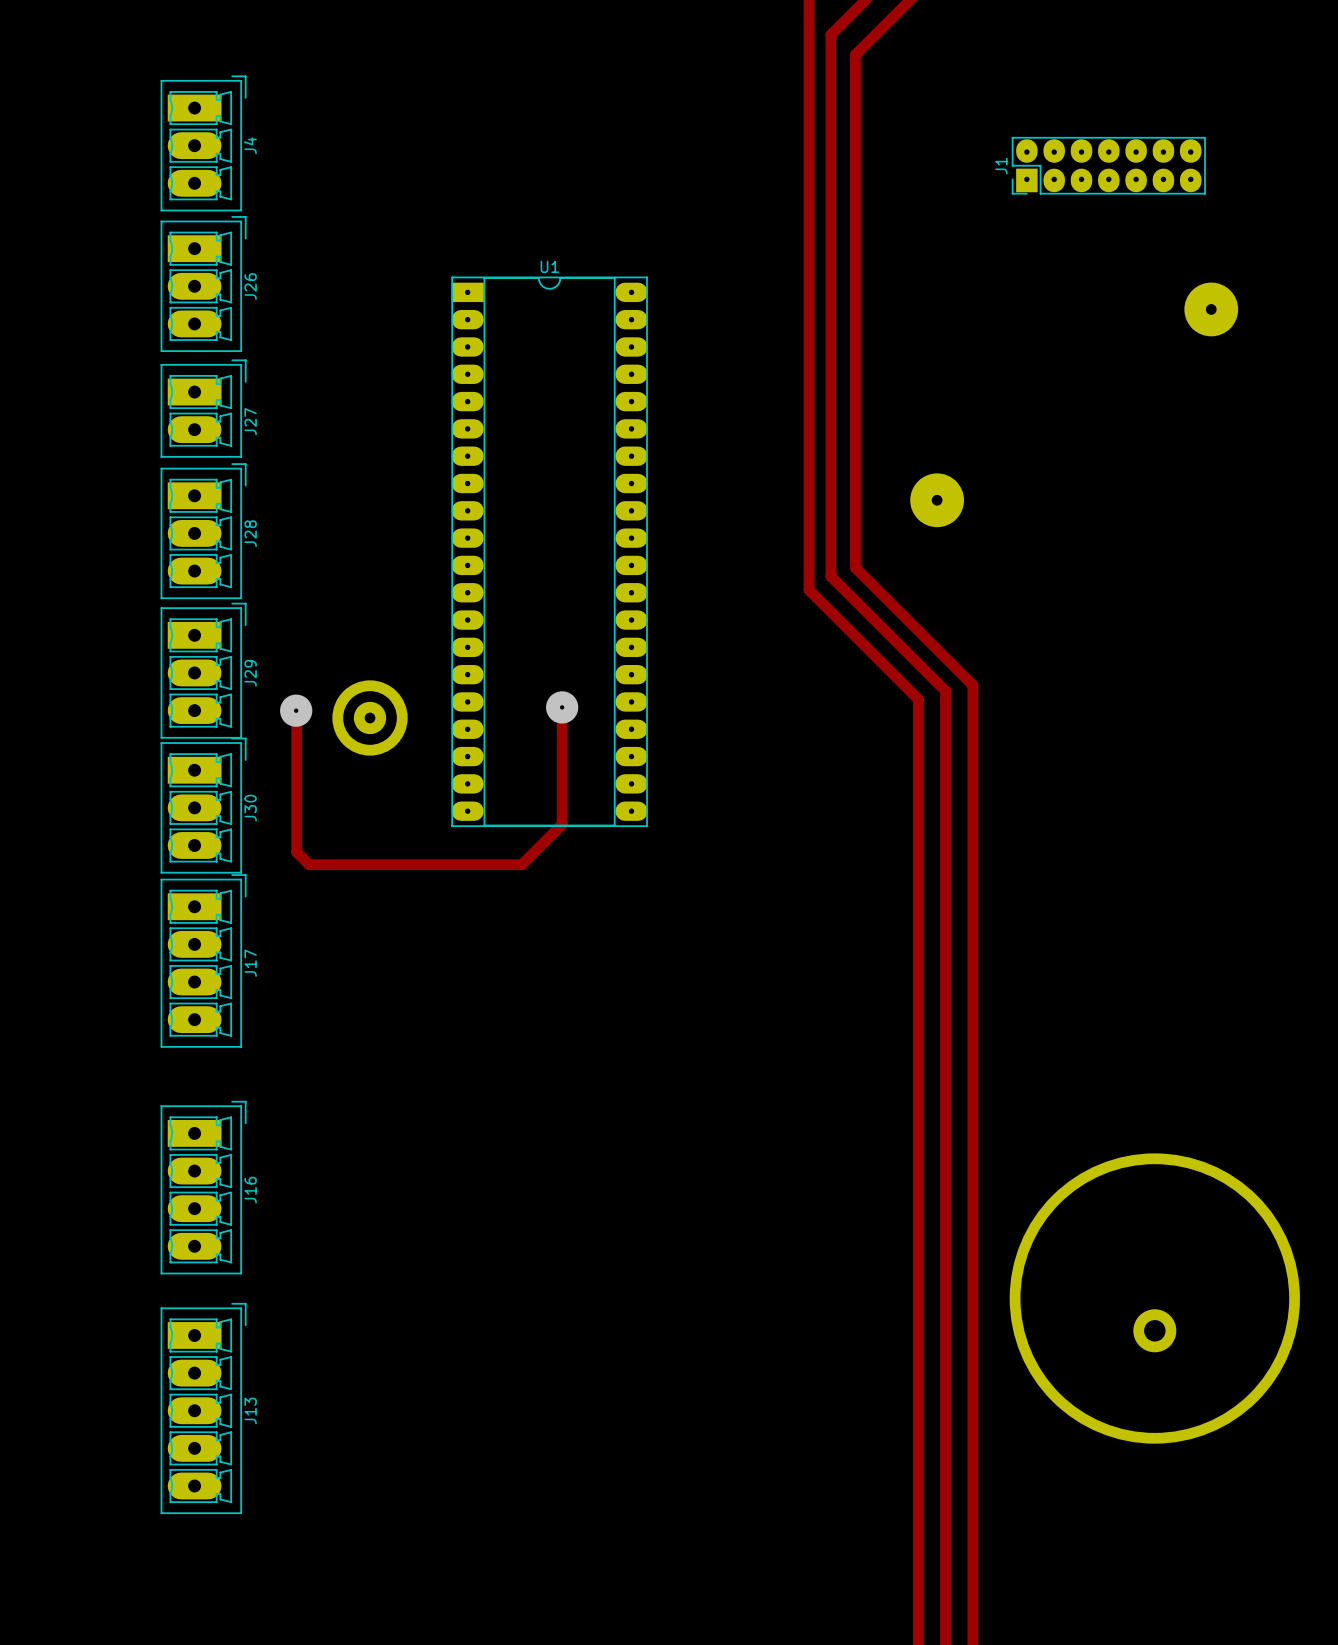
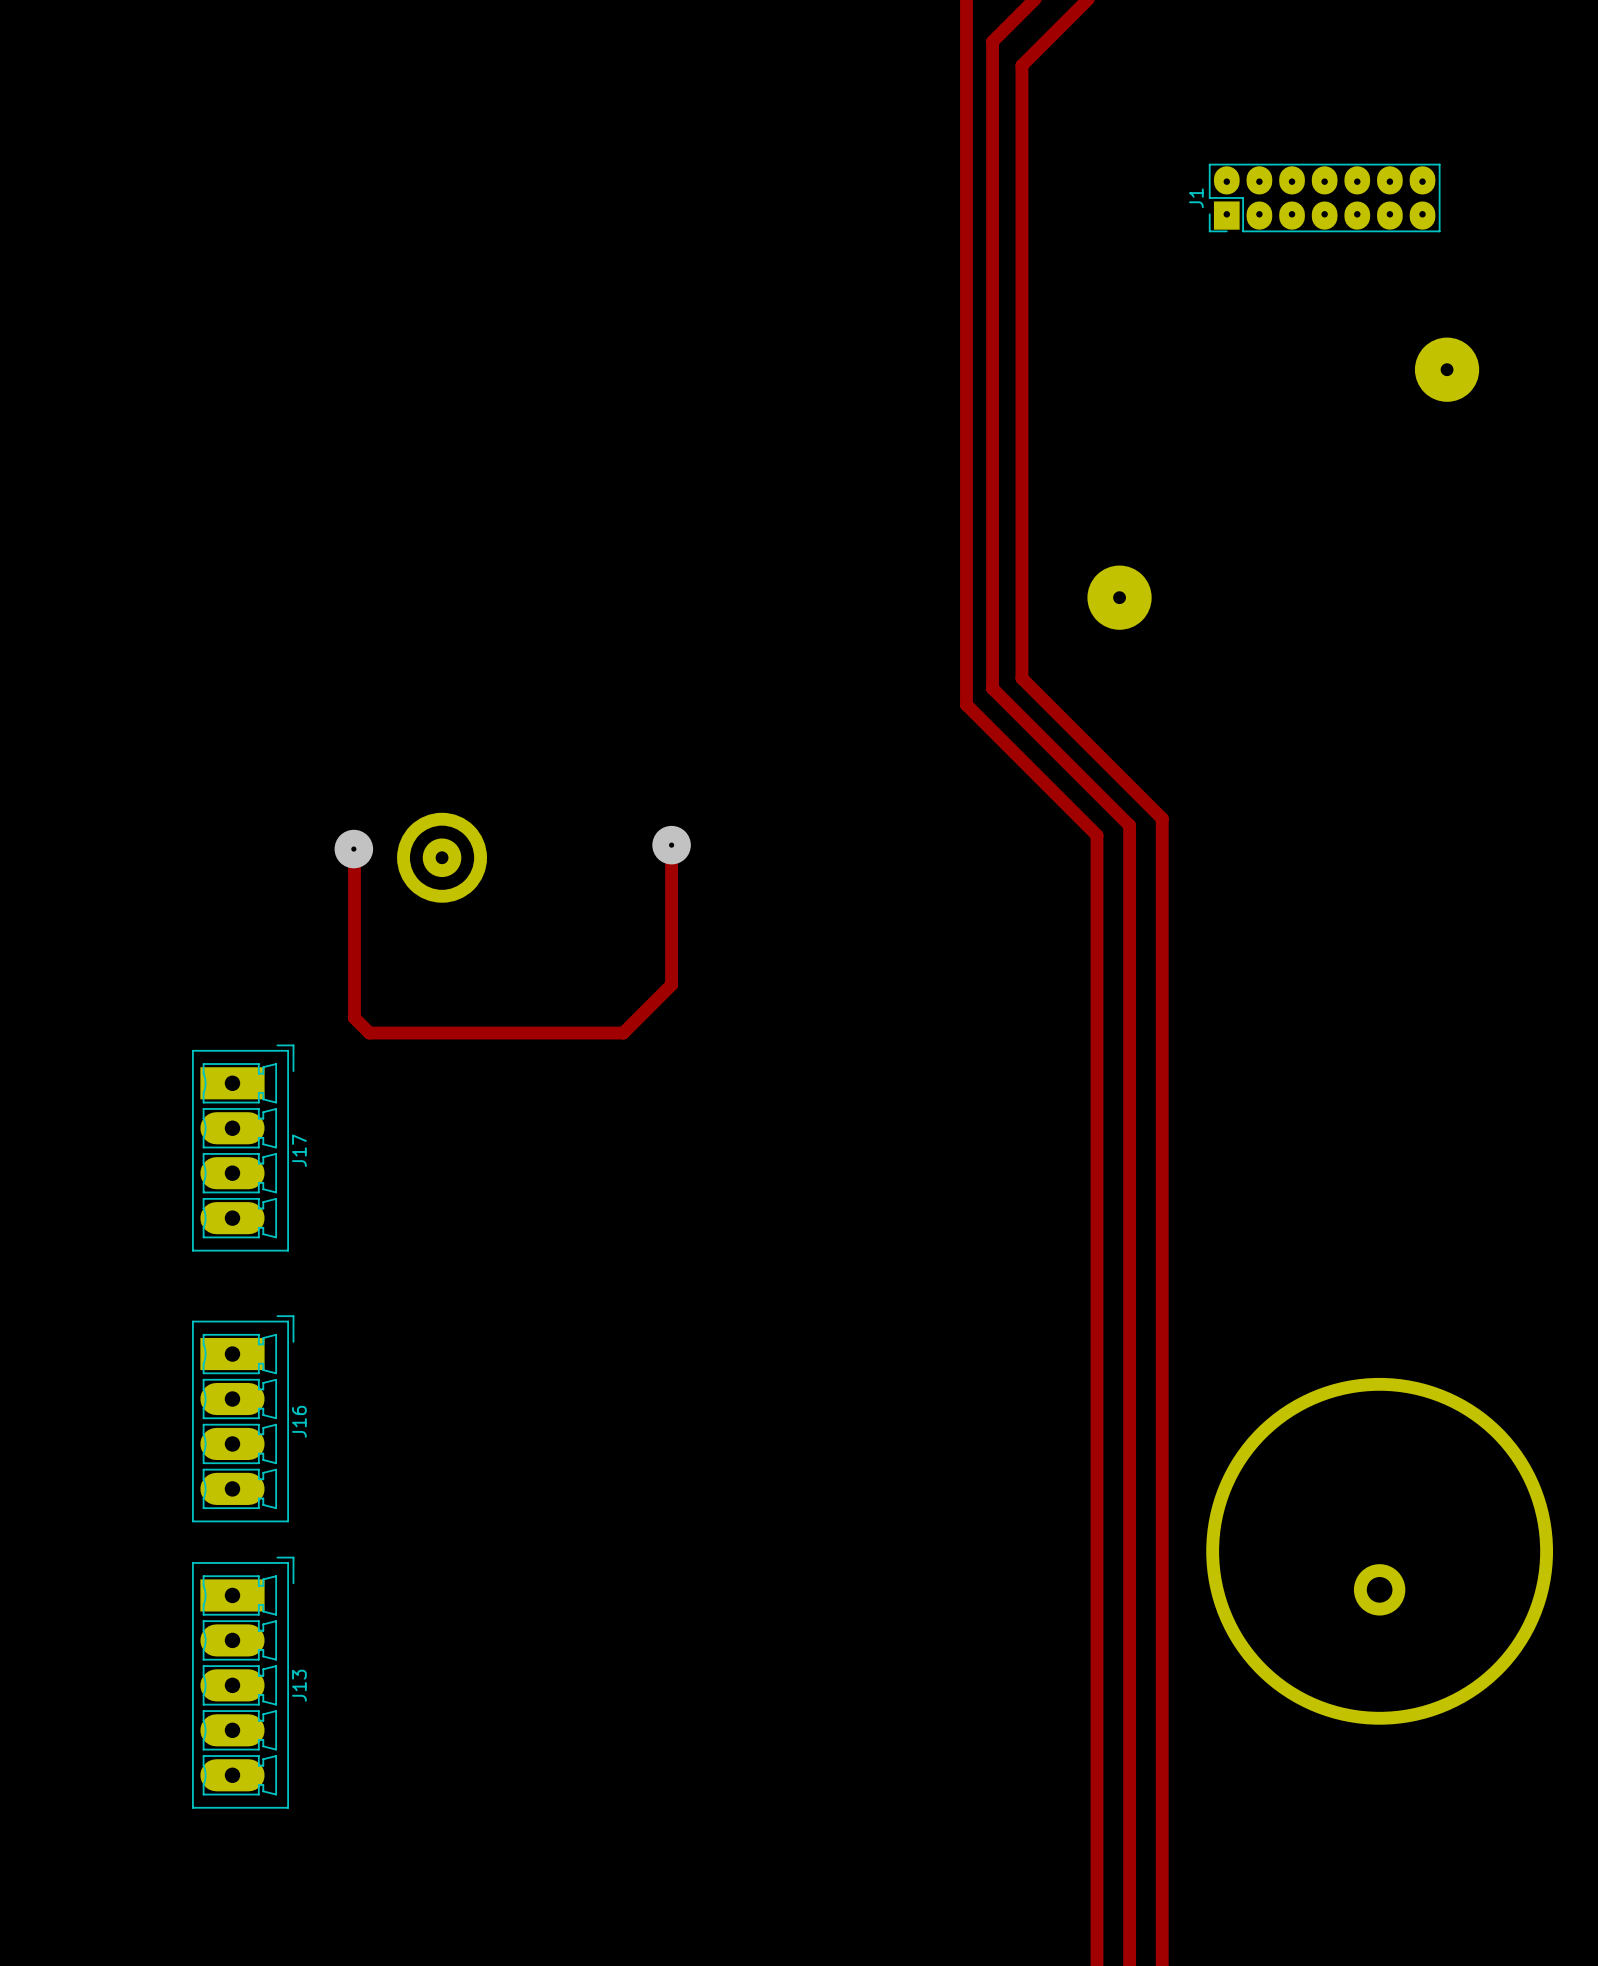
J4: (203, 143) -> none
J26: (203, 284) -> none
J27: (203, 408) -> none
J28: (203, 531) -> none
U1: (549, 551) -> none
J29: (203, 670) -> none
J30: (203, 805) -> none

